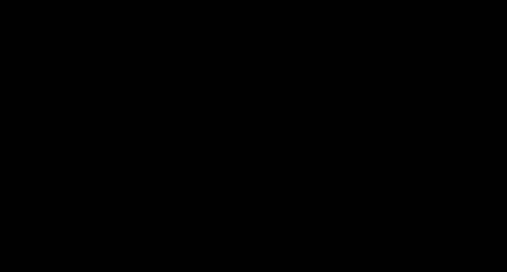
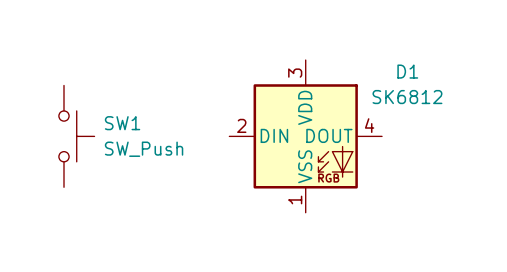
SW1: none -> SW_Push (76, 136)
D1: none -> SK6812 (305, 136)

